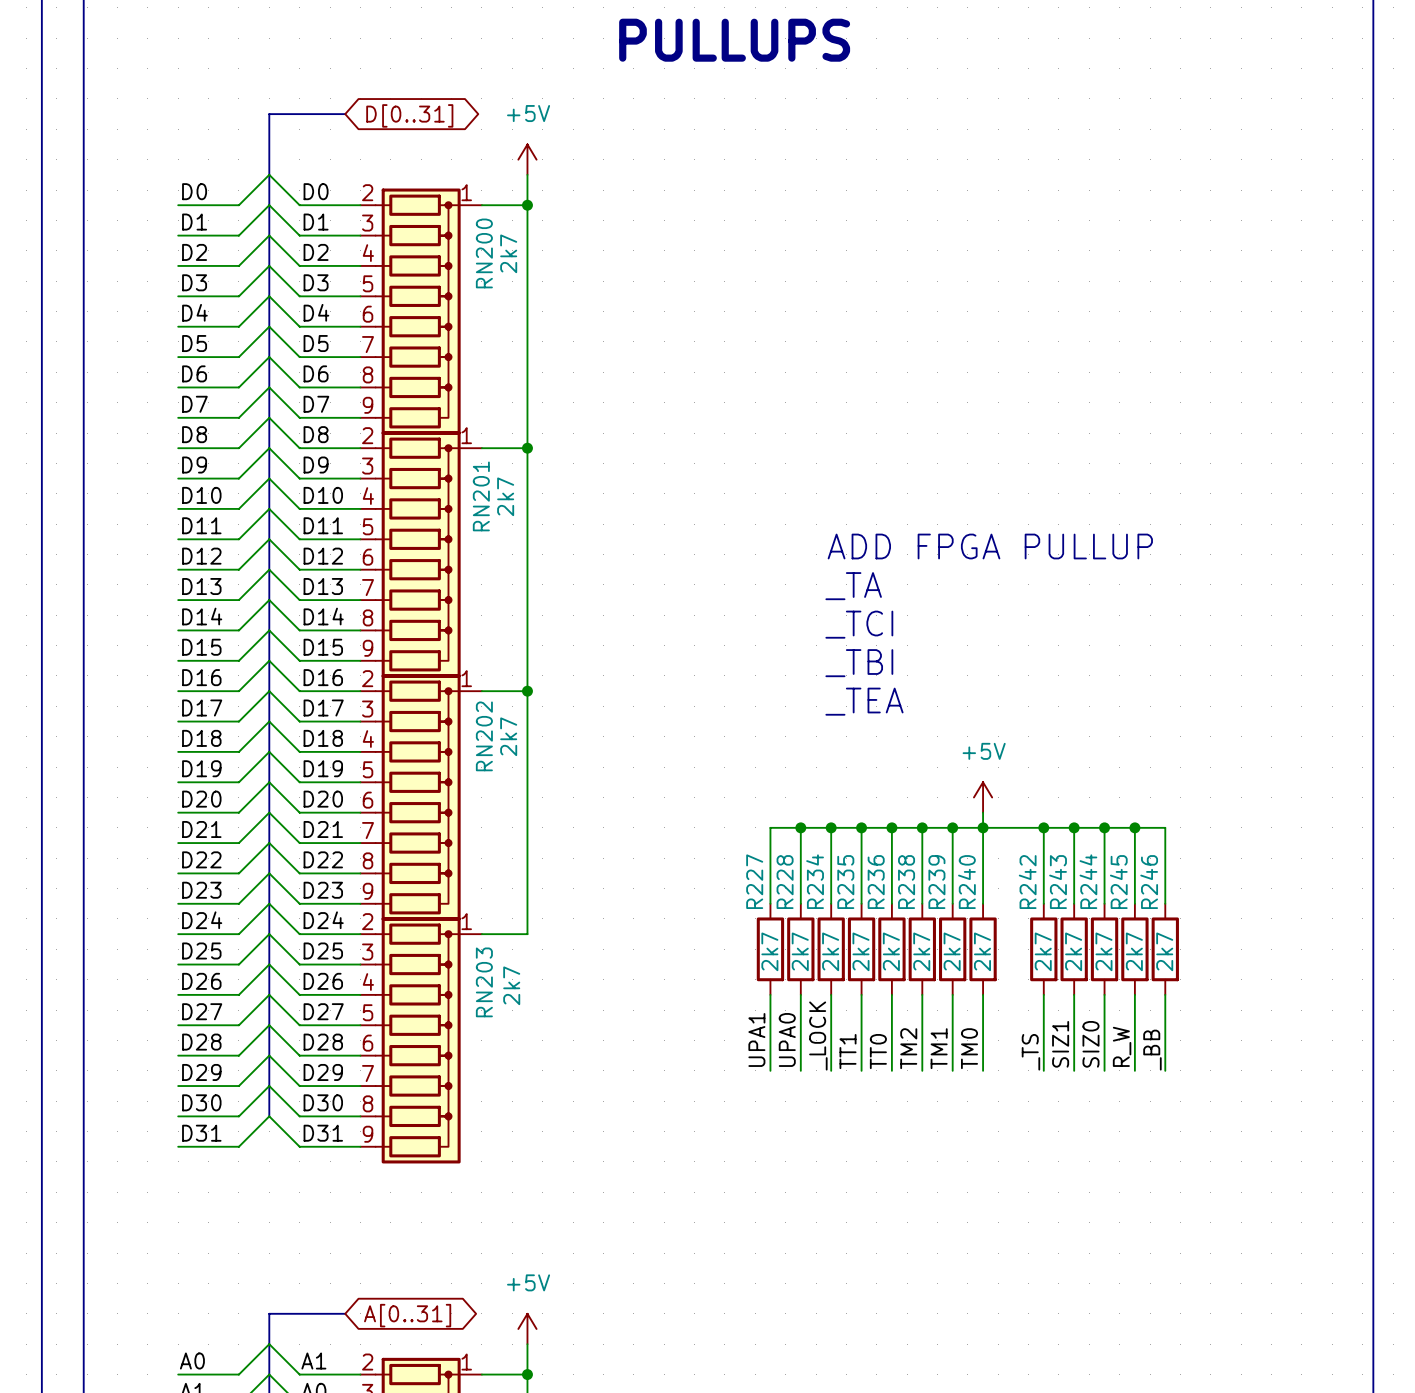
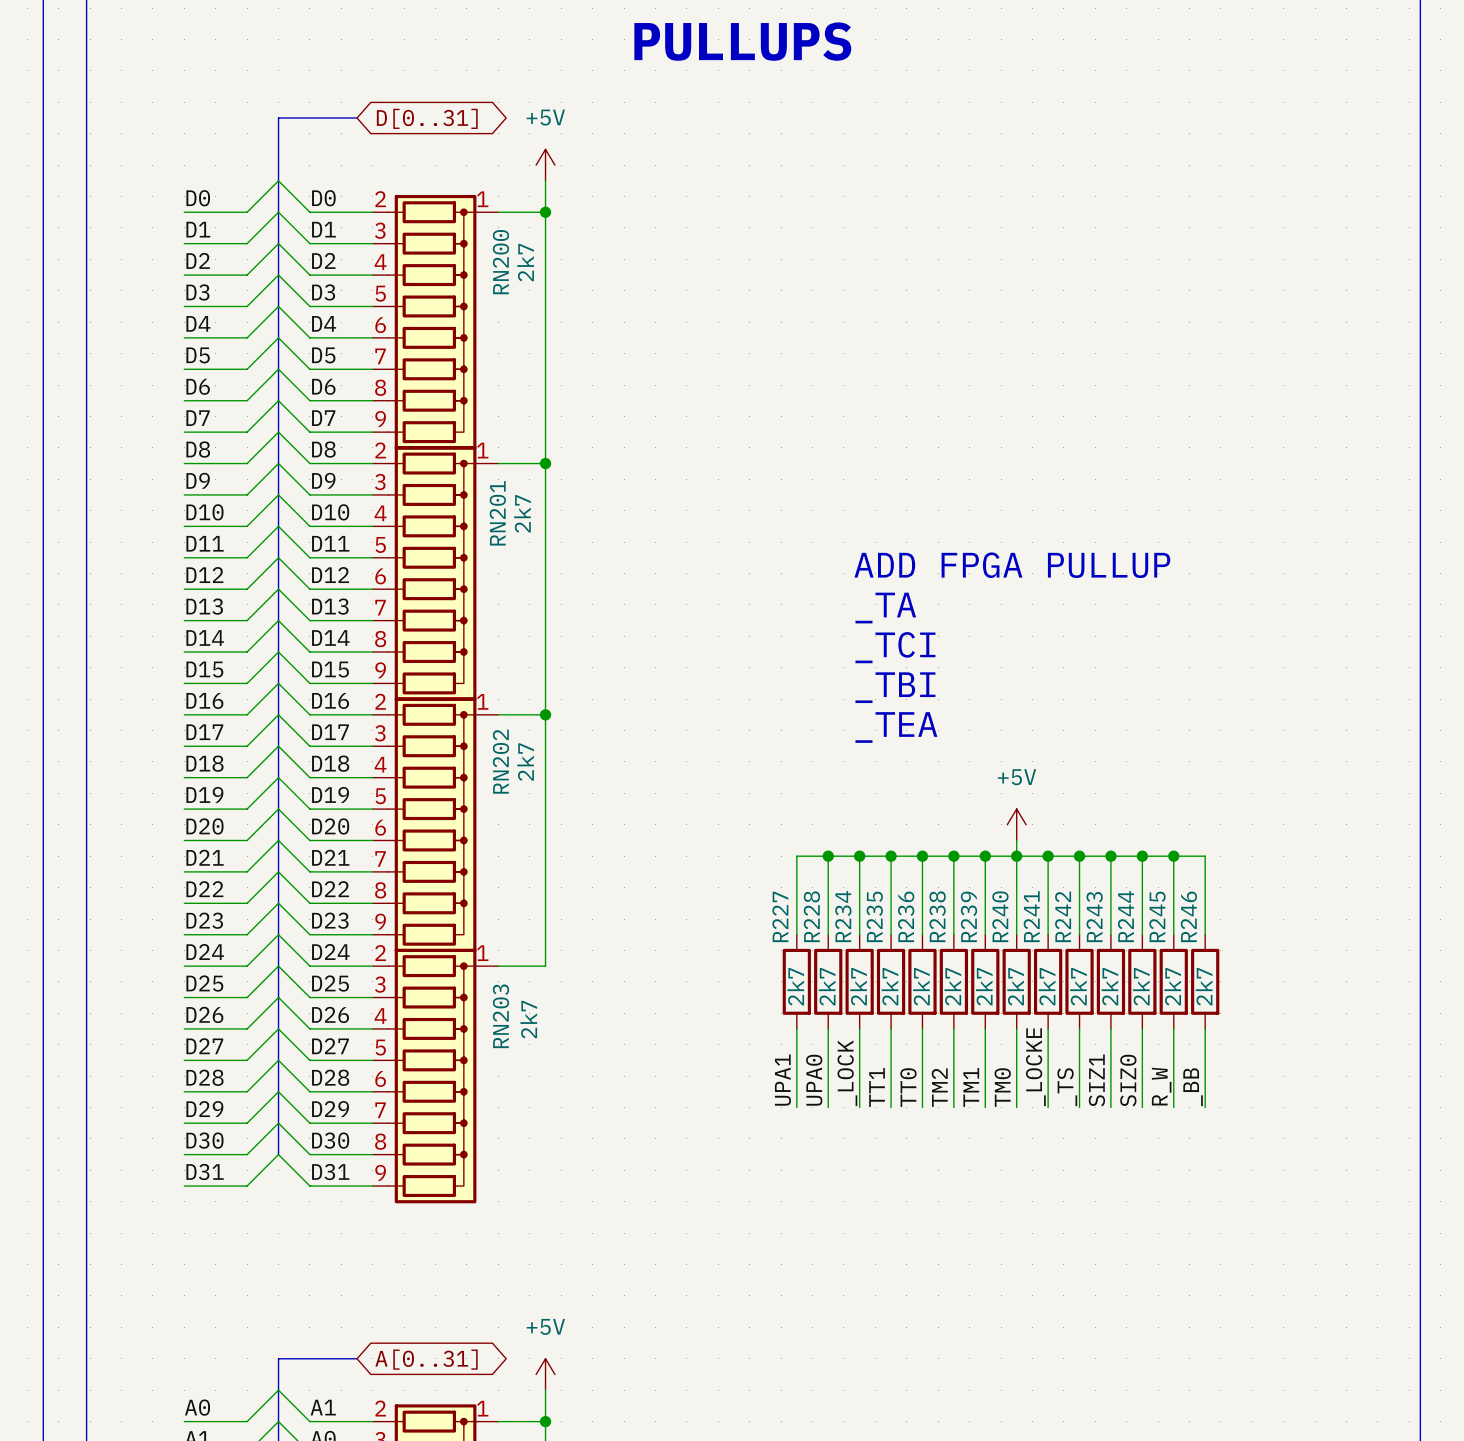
wire: none -> (1048, 856) (1048, 934)
junction: none -> (1048, 856)
R241: none -> 2k7 (1048, 981)
wire: none -> (1048, 1028) (1048, 1107)
label: none -> _LOCKE (1035, 1067)

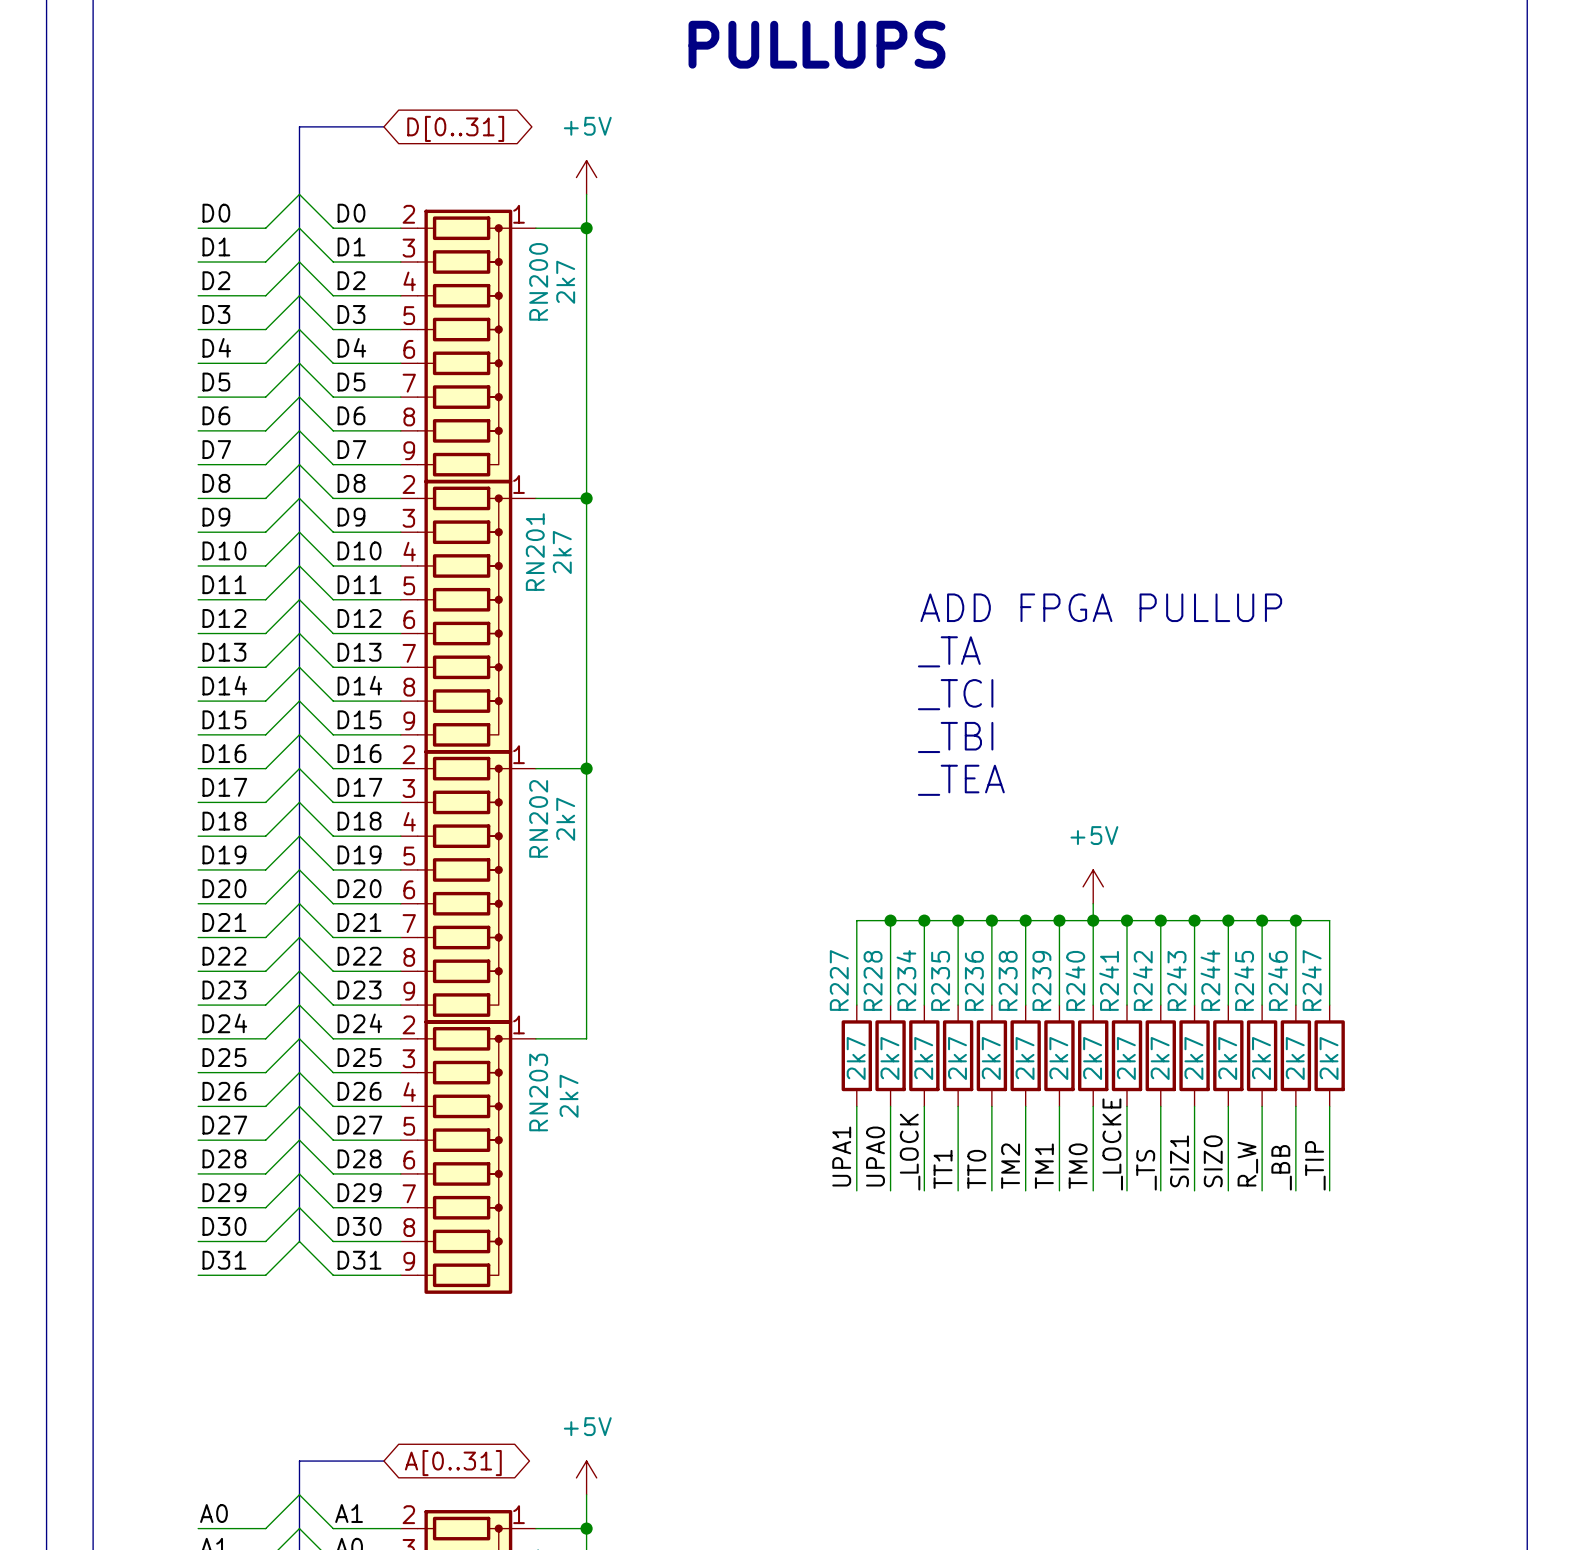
wire: none -> (1295, 920) (1329, 920) (1329, 1005)
junction: none -> (1295, 920)
R247: none -> 2k7 (1329, 1055)
wire: none -> (1329, 1106) (1329, 1190)
label: none -> _TIP (1315, 1165)

